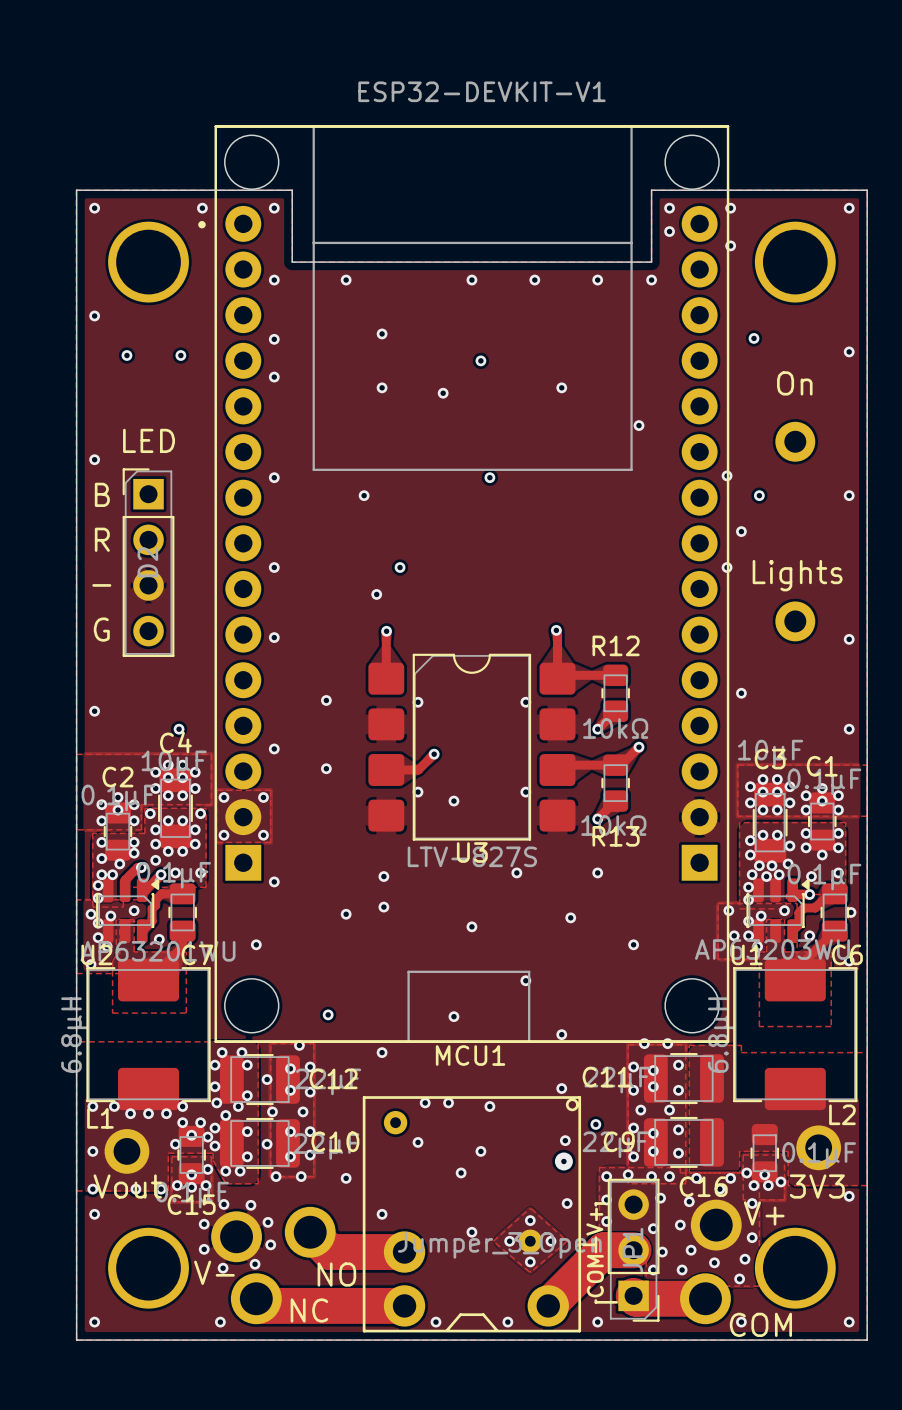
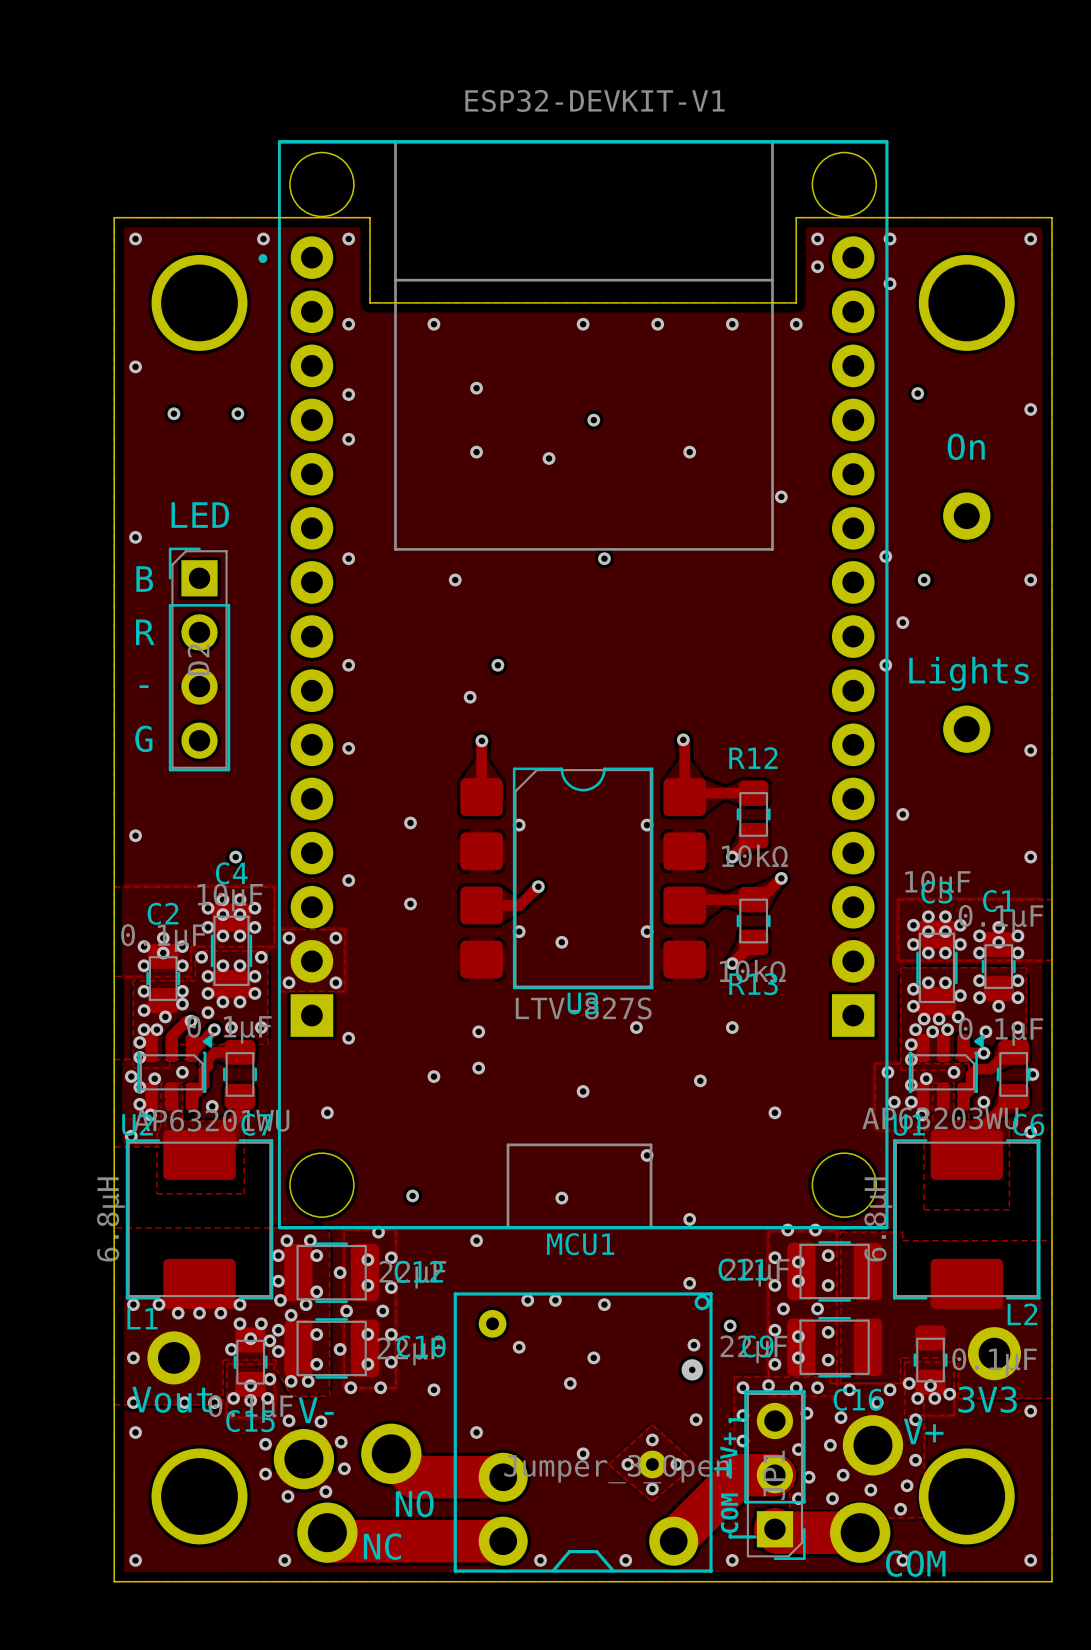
text position: V- (214, 1272) -> V- (316, 1410)

